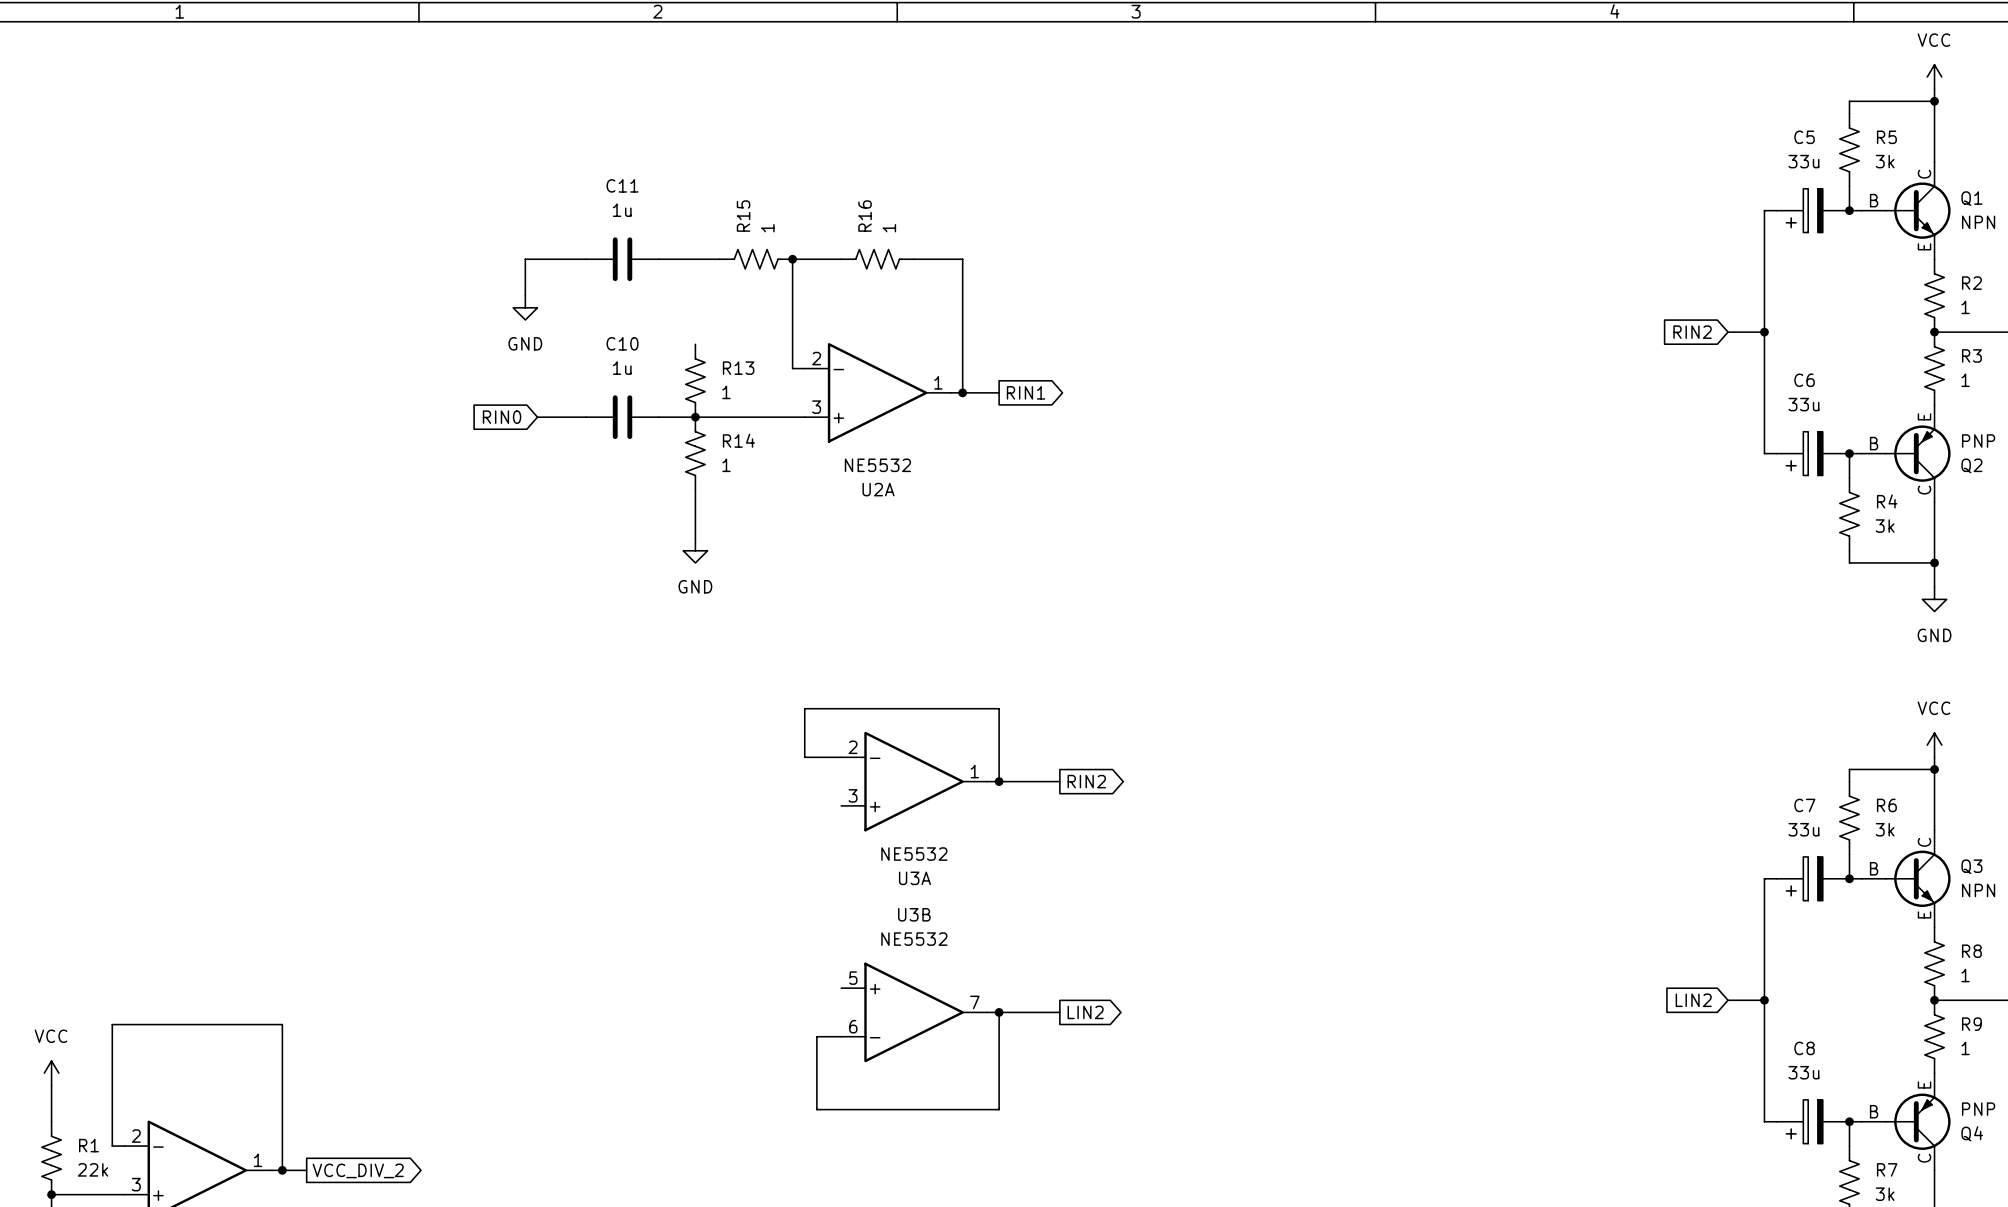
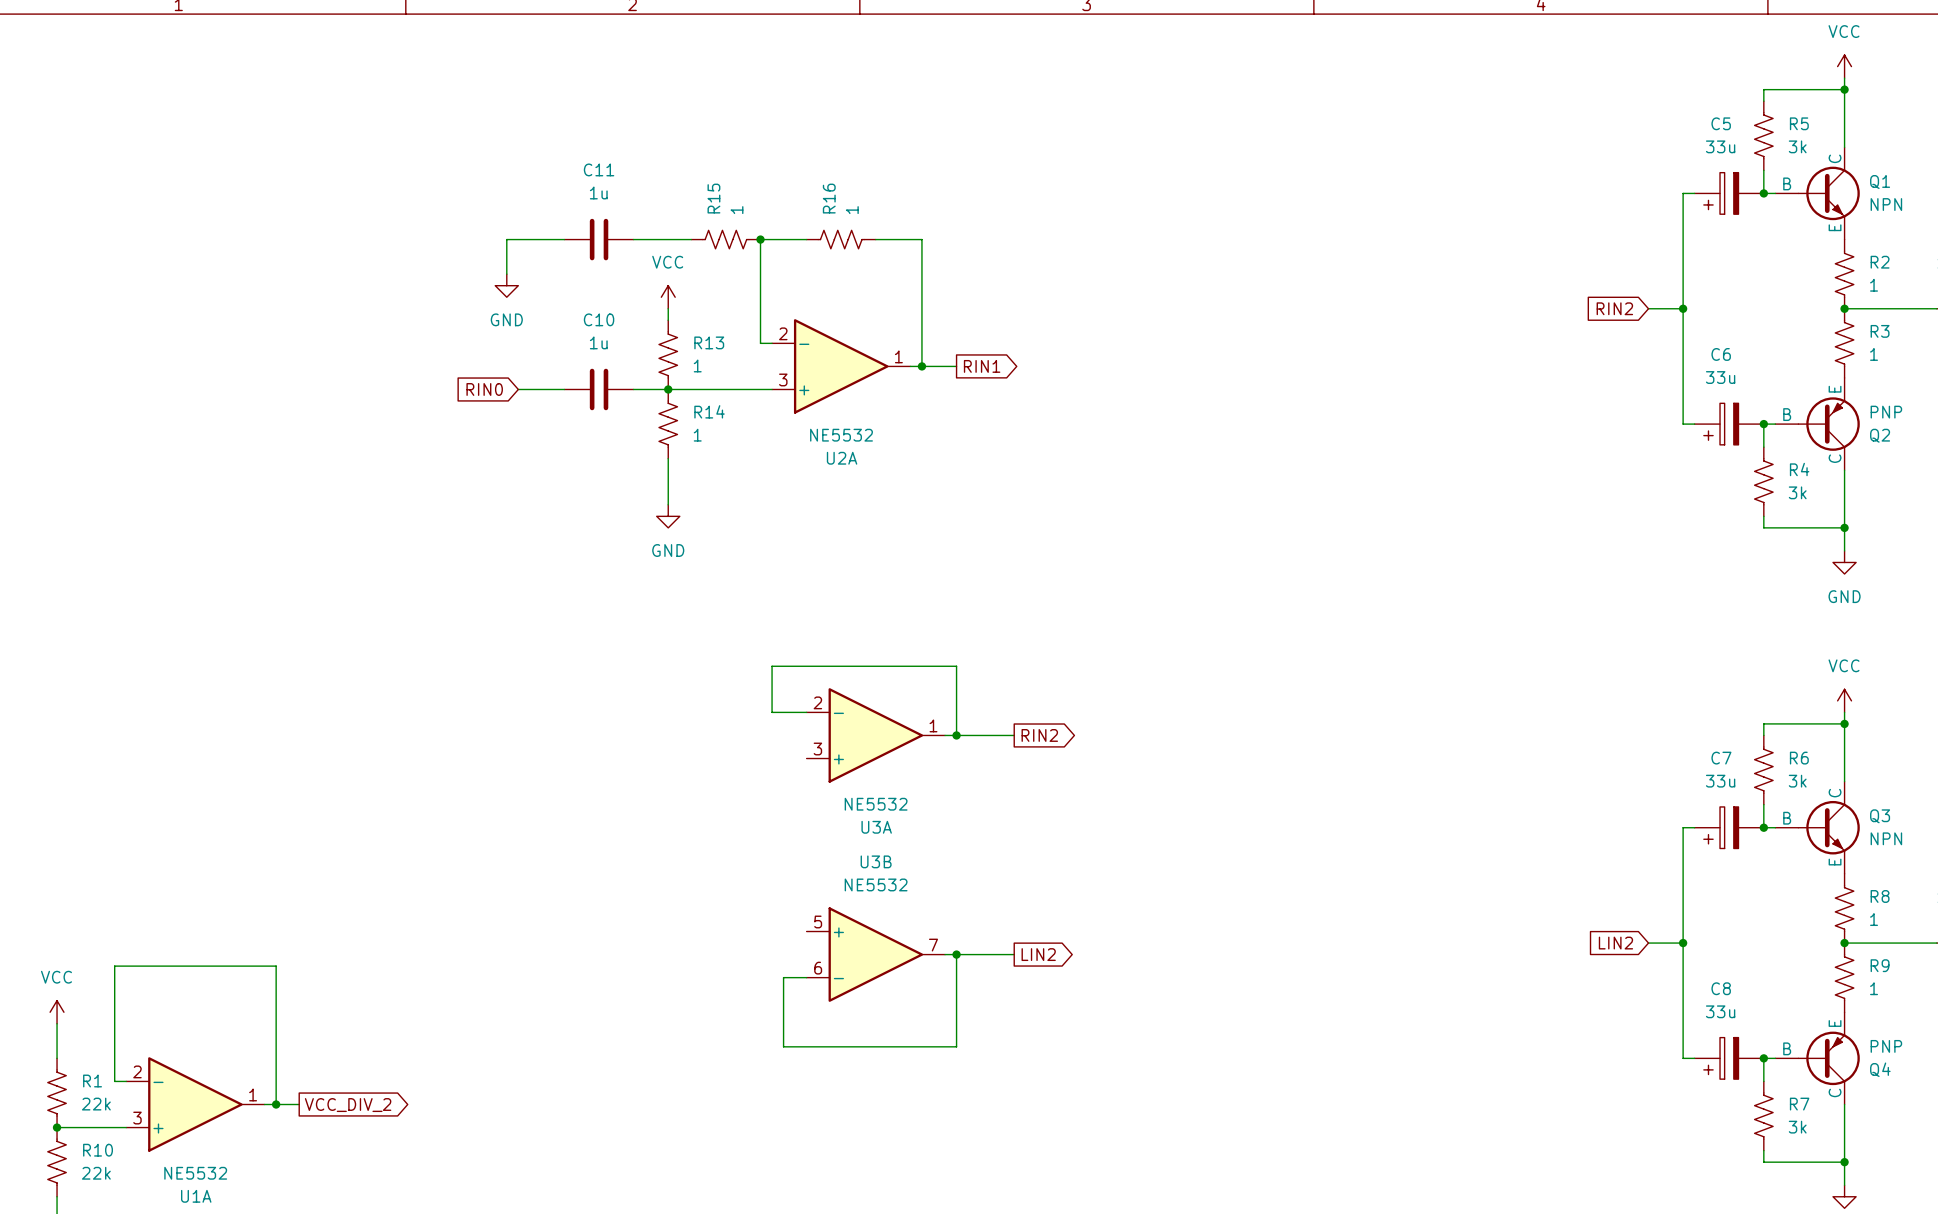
power symbol: none -> VCC (668, 297)
wire: none -> (668, 308) (668, 320)

